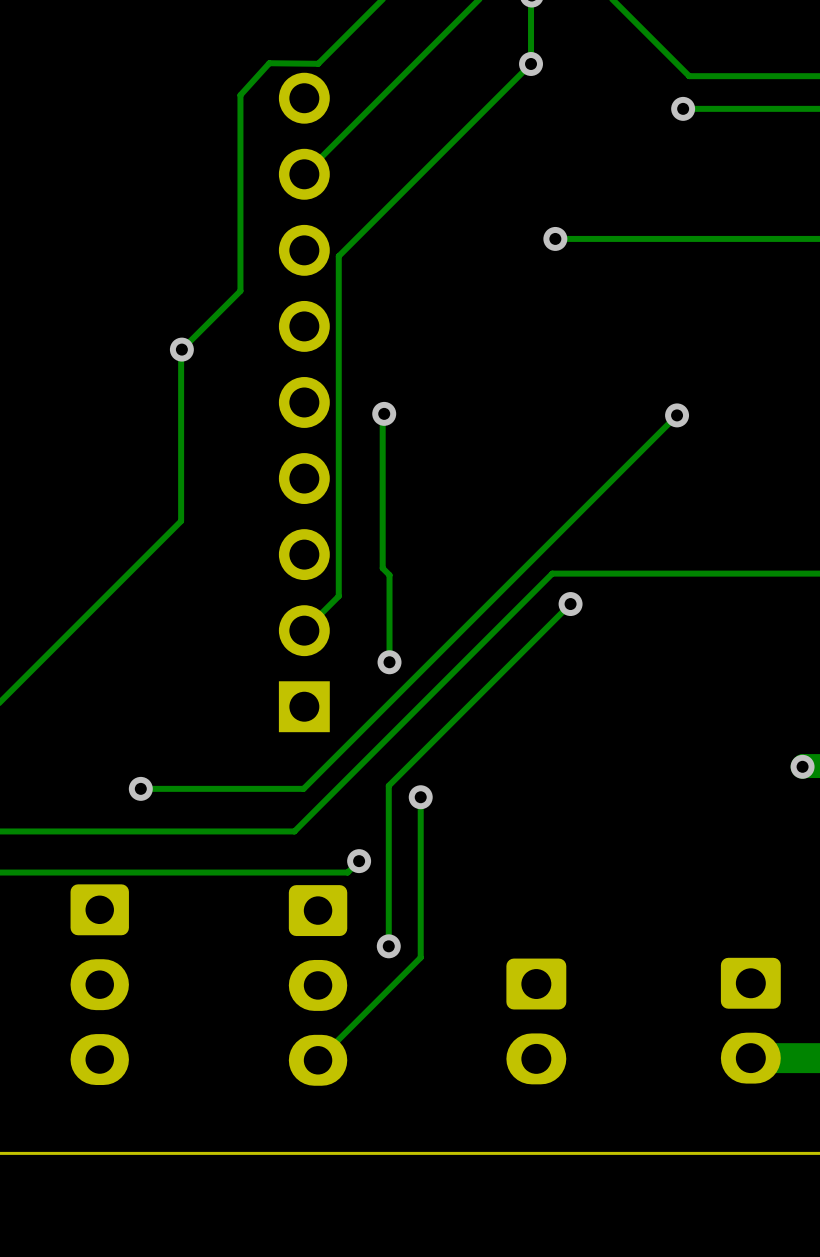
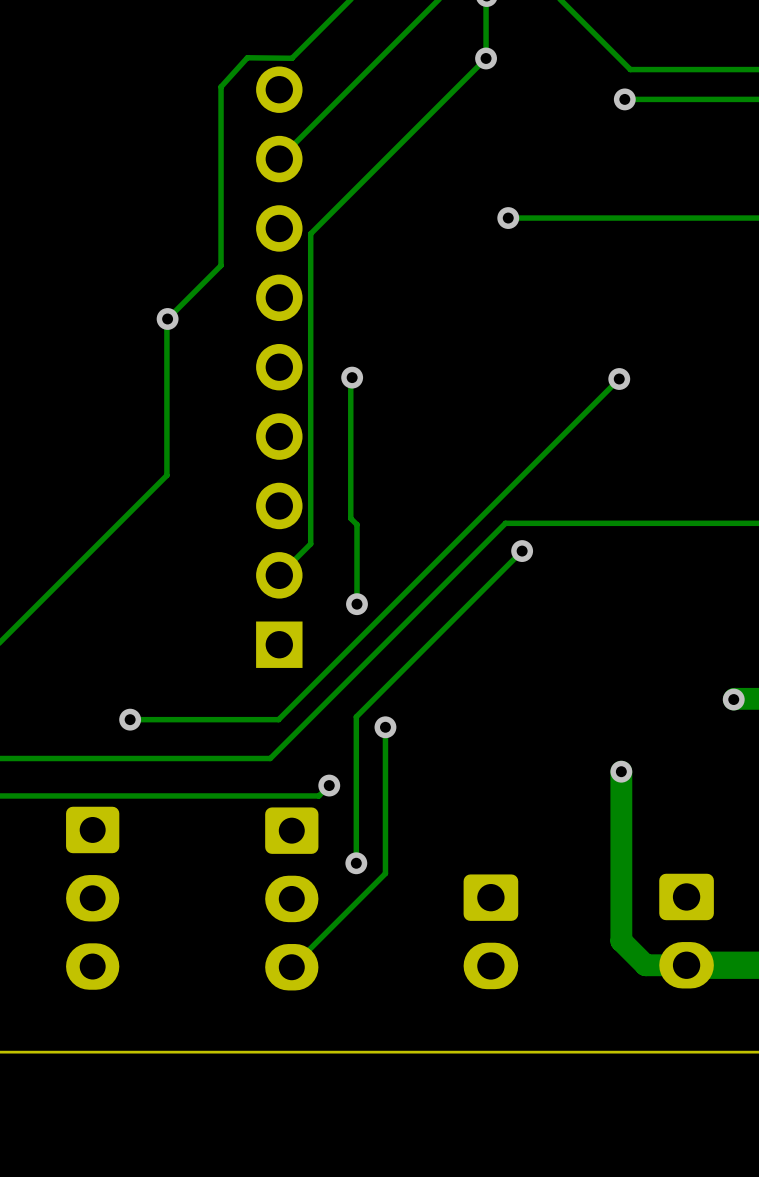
track: none -> (621, 771) (621, 941) (645, 965) (686, 965)
via: none -> (621, 771)

